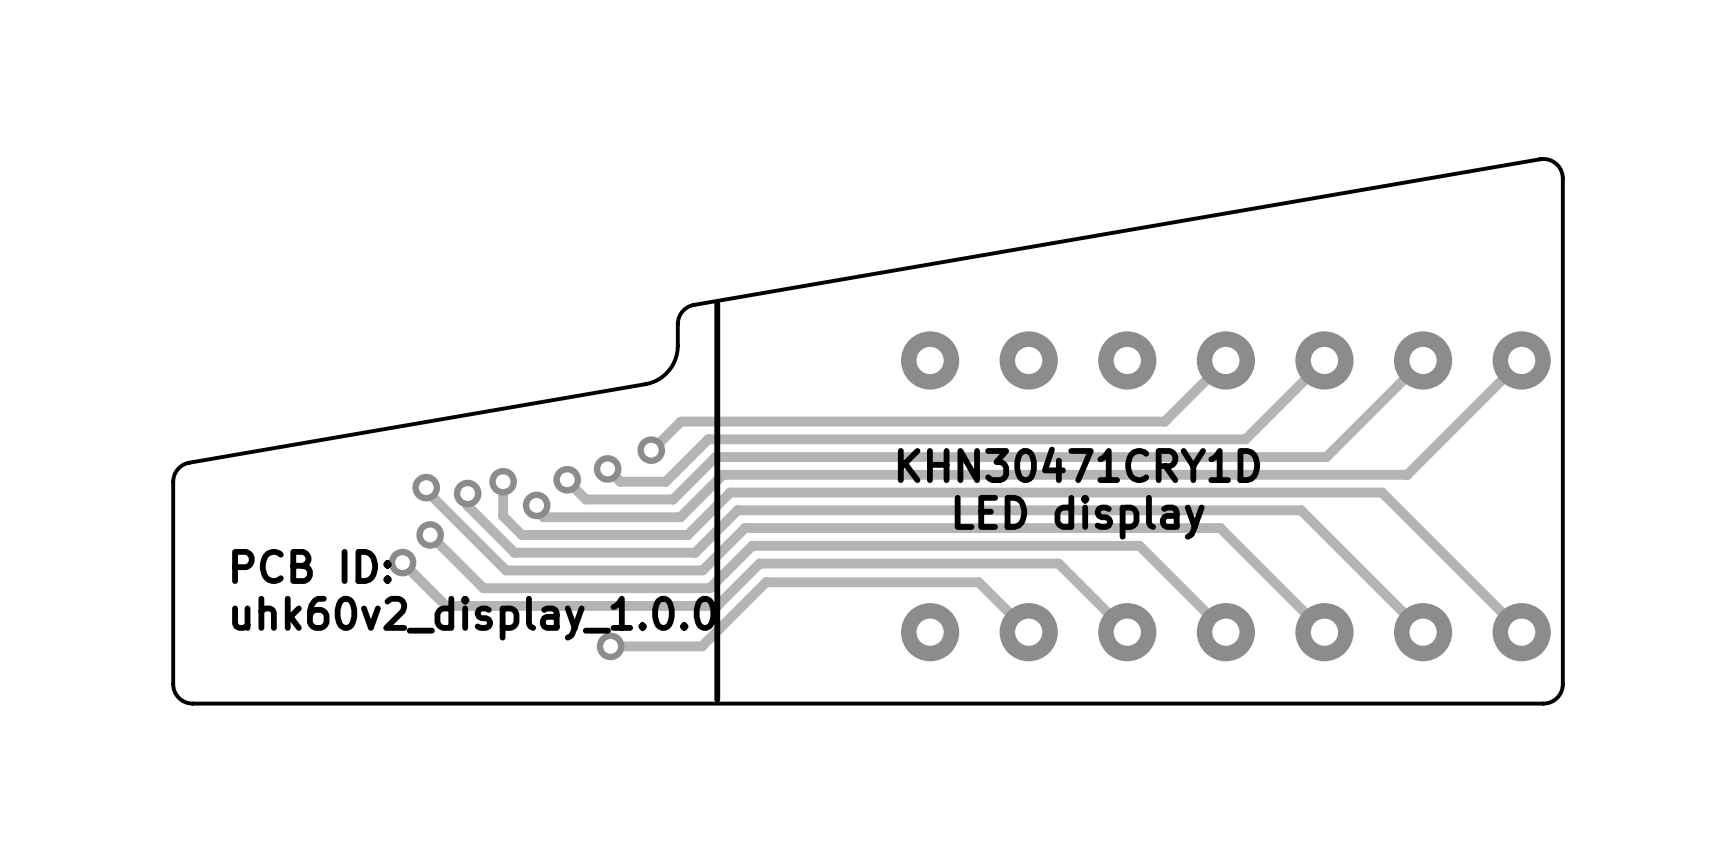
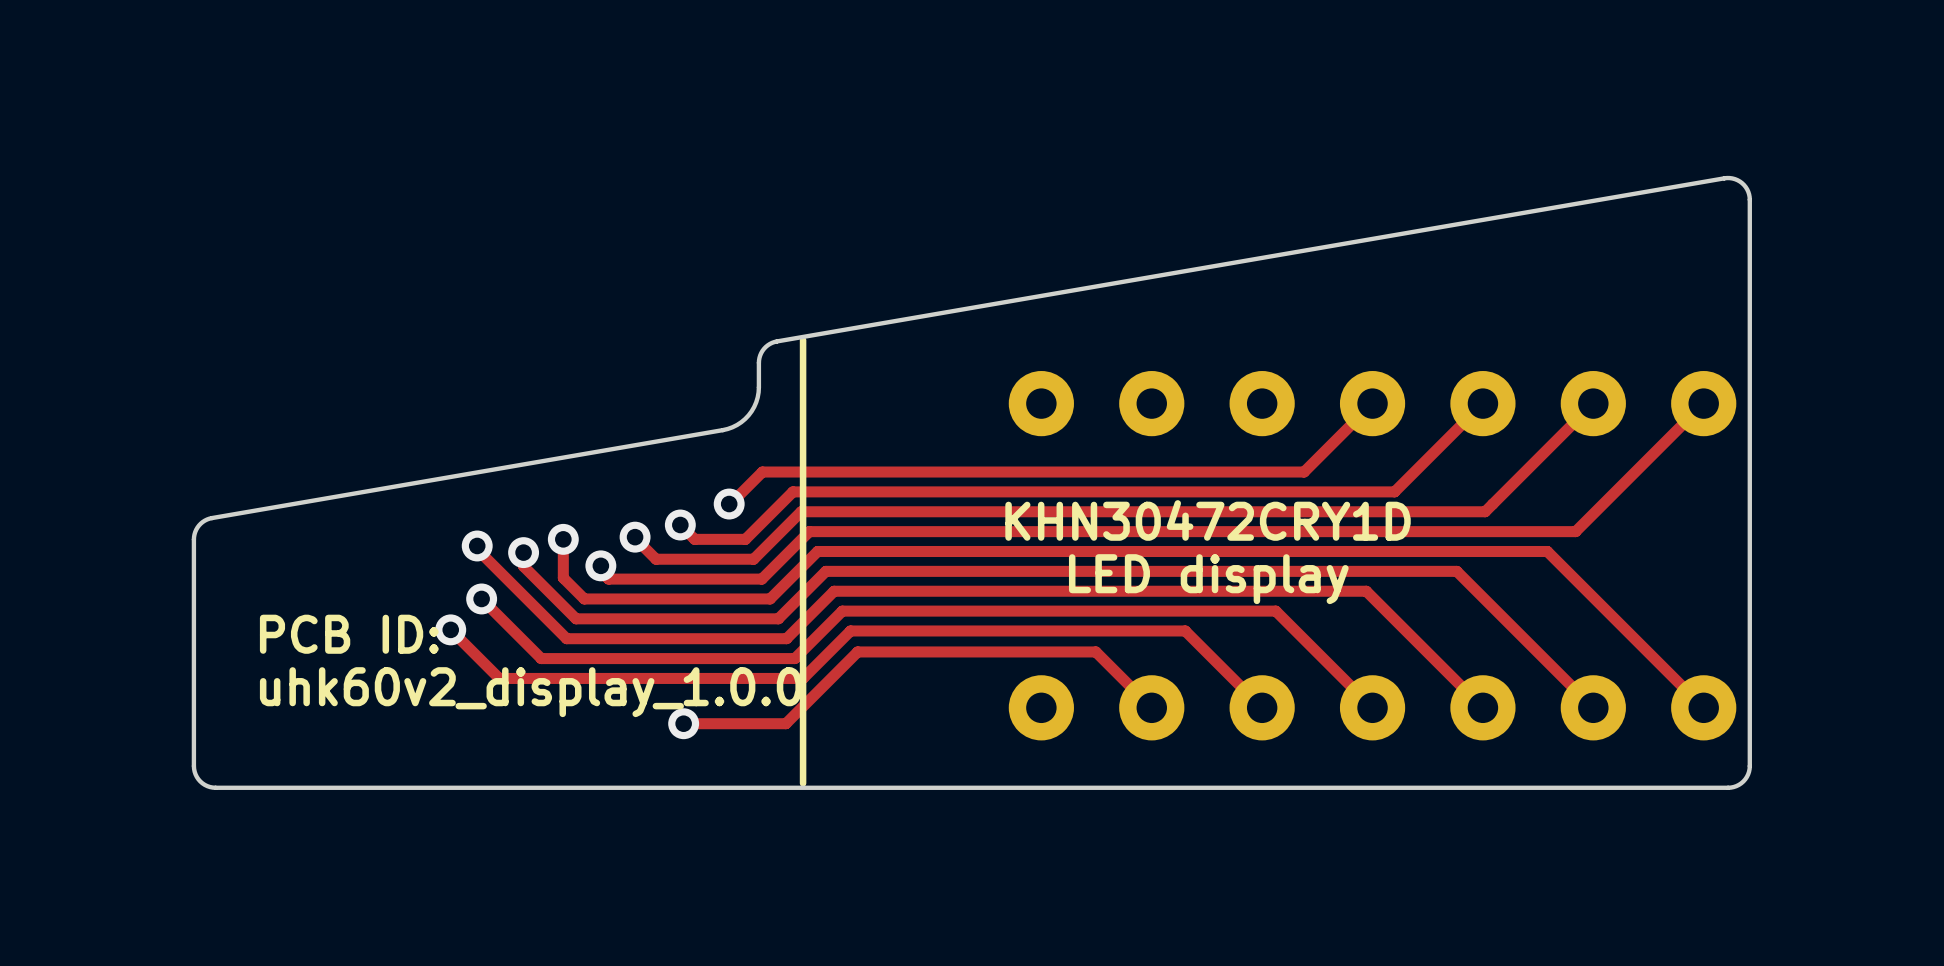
text: KHN30471CRY1D (1078, 464) -> KHN30472CRY1D (1208, 520)

